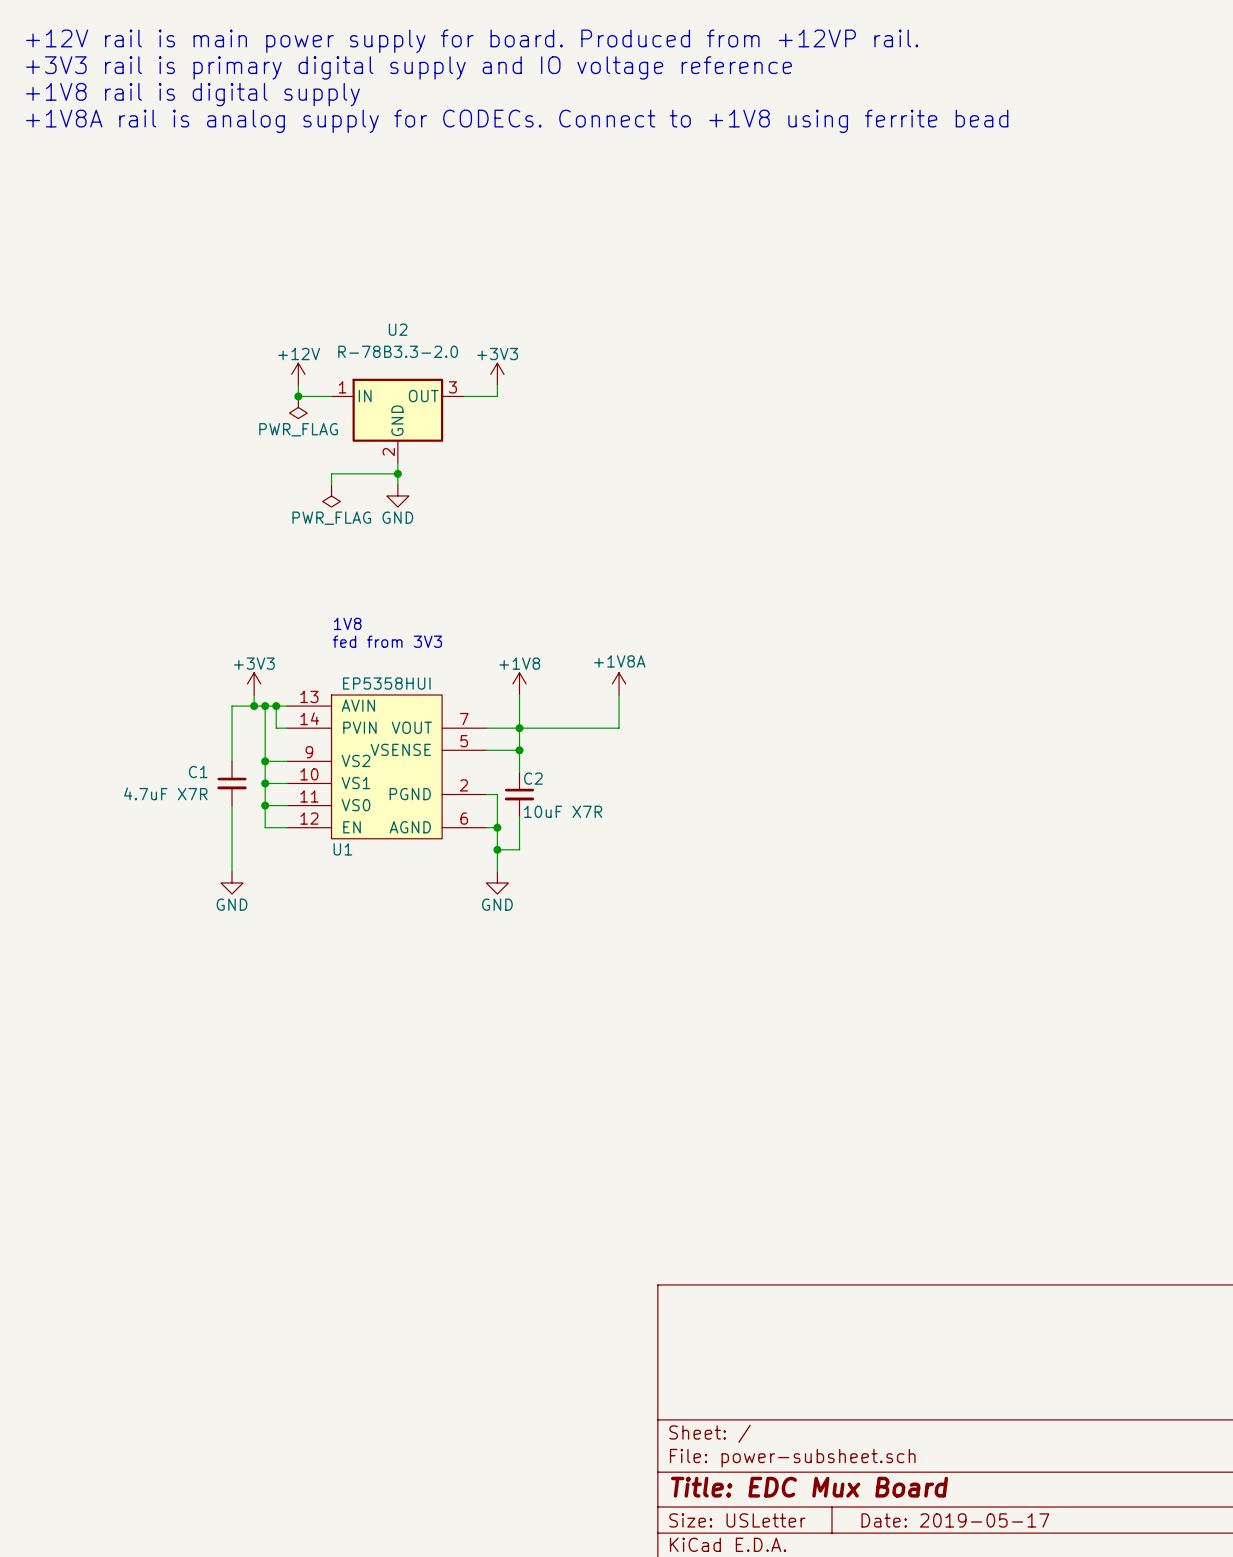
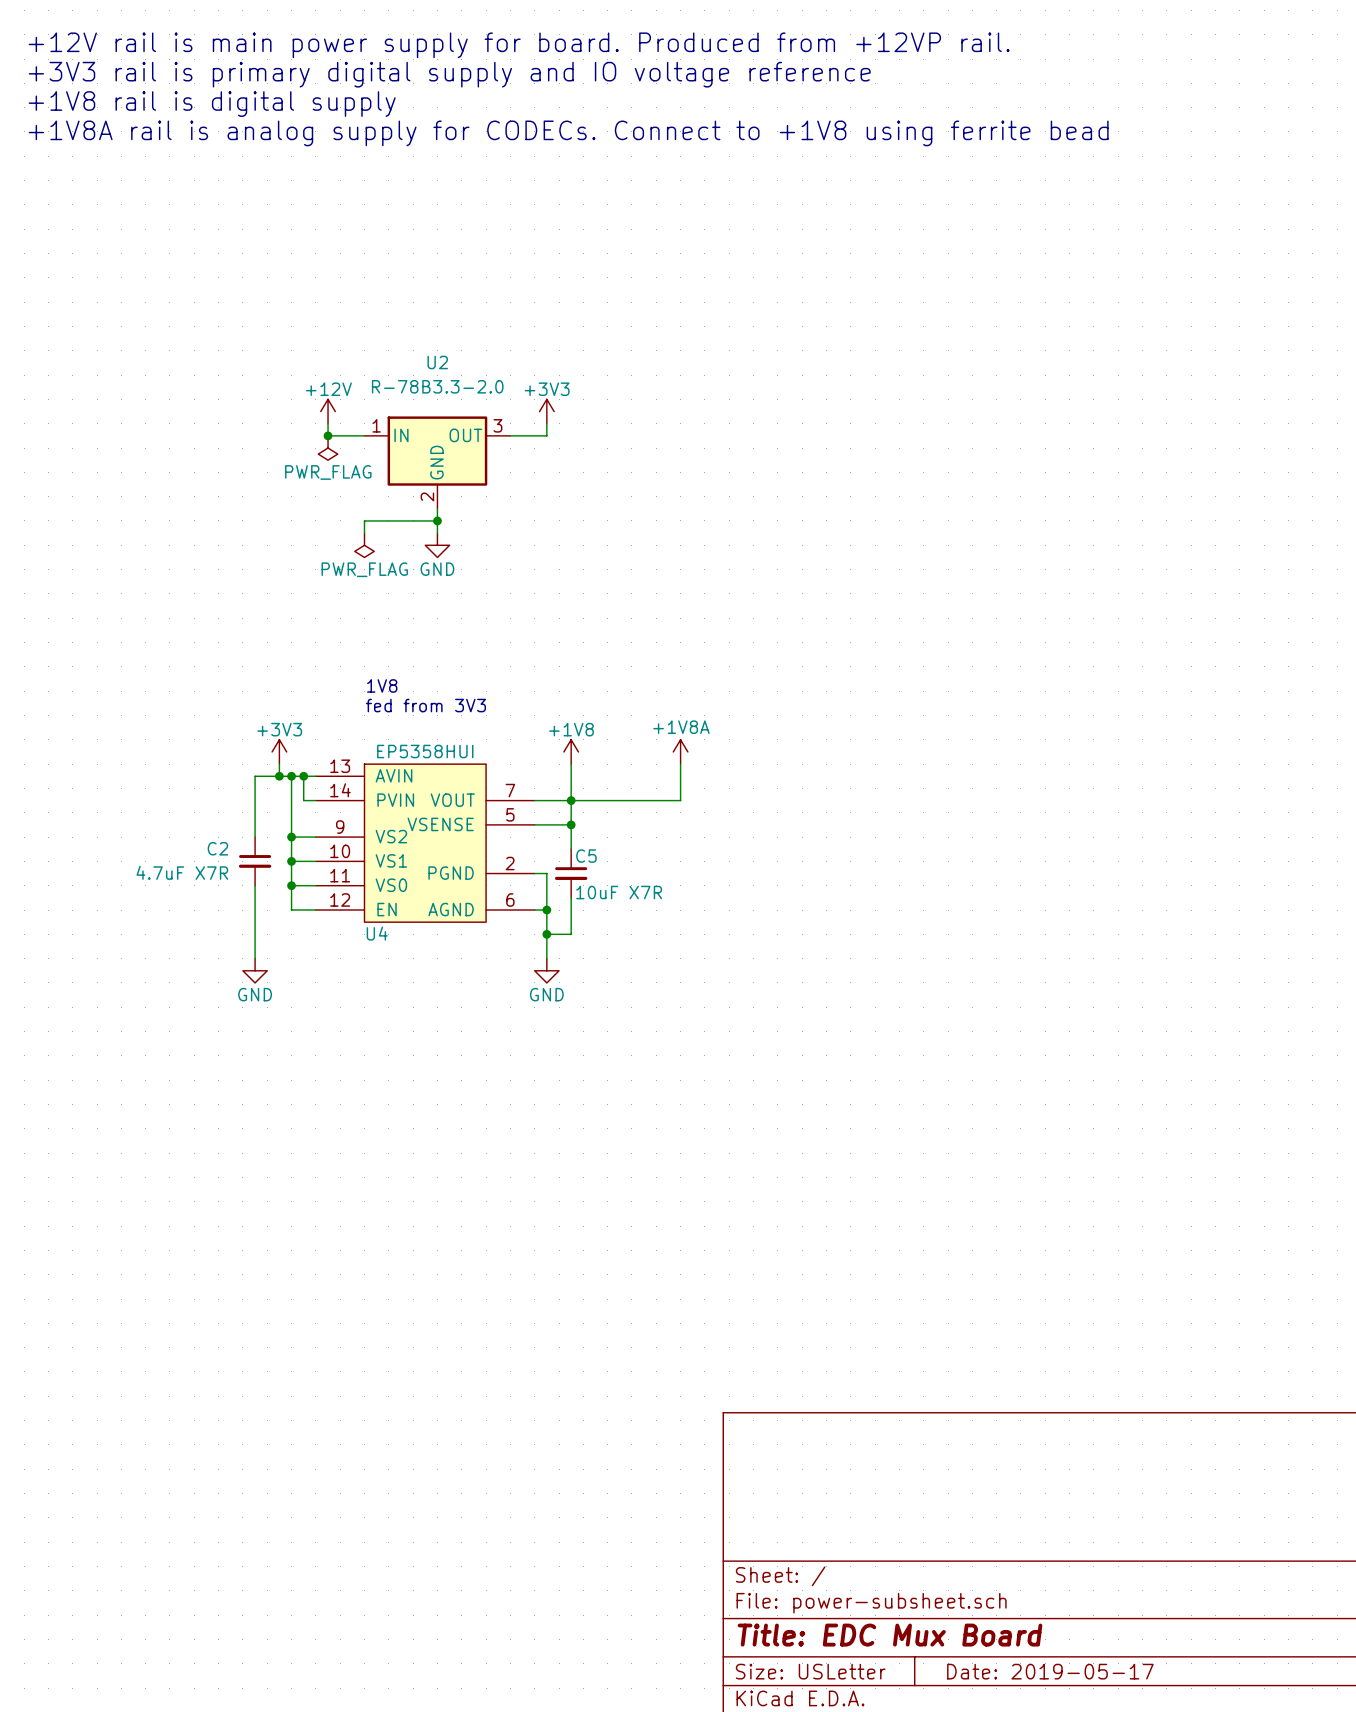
C1 name: C1 (198, 772) -> C2 (217, 848)
C2 name: C2 (533, 778) -> C5 (586, 856)
U1 name: U1 (342, 849) -> U4 (377, 933)

